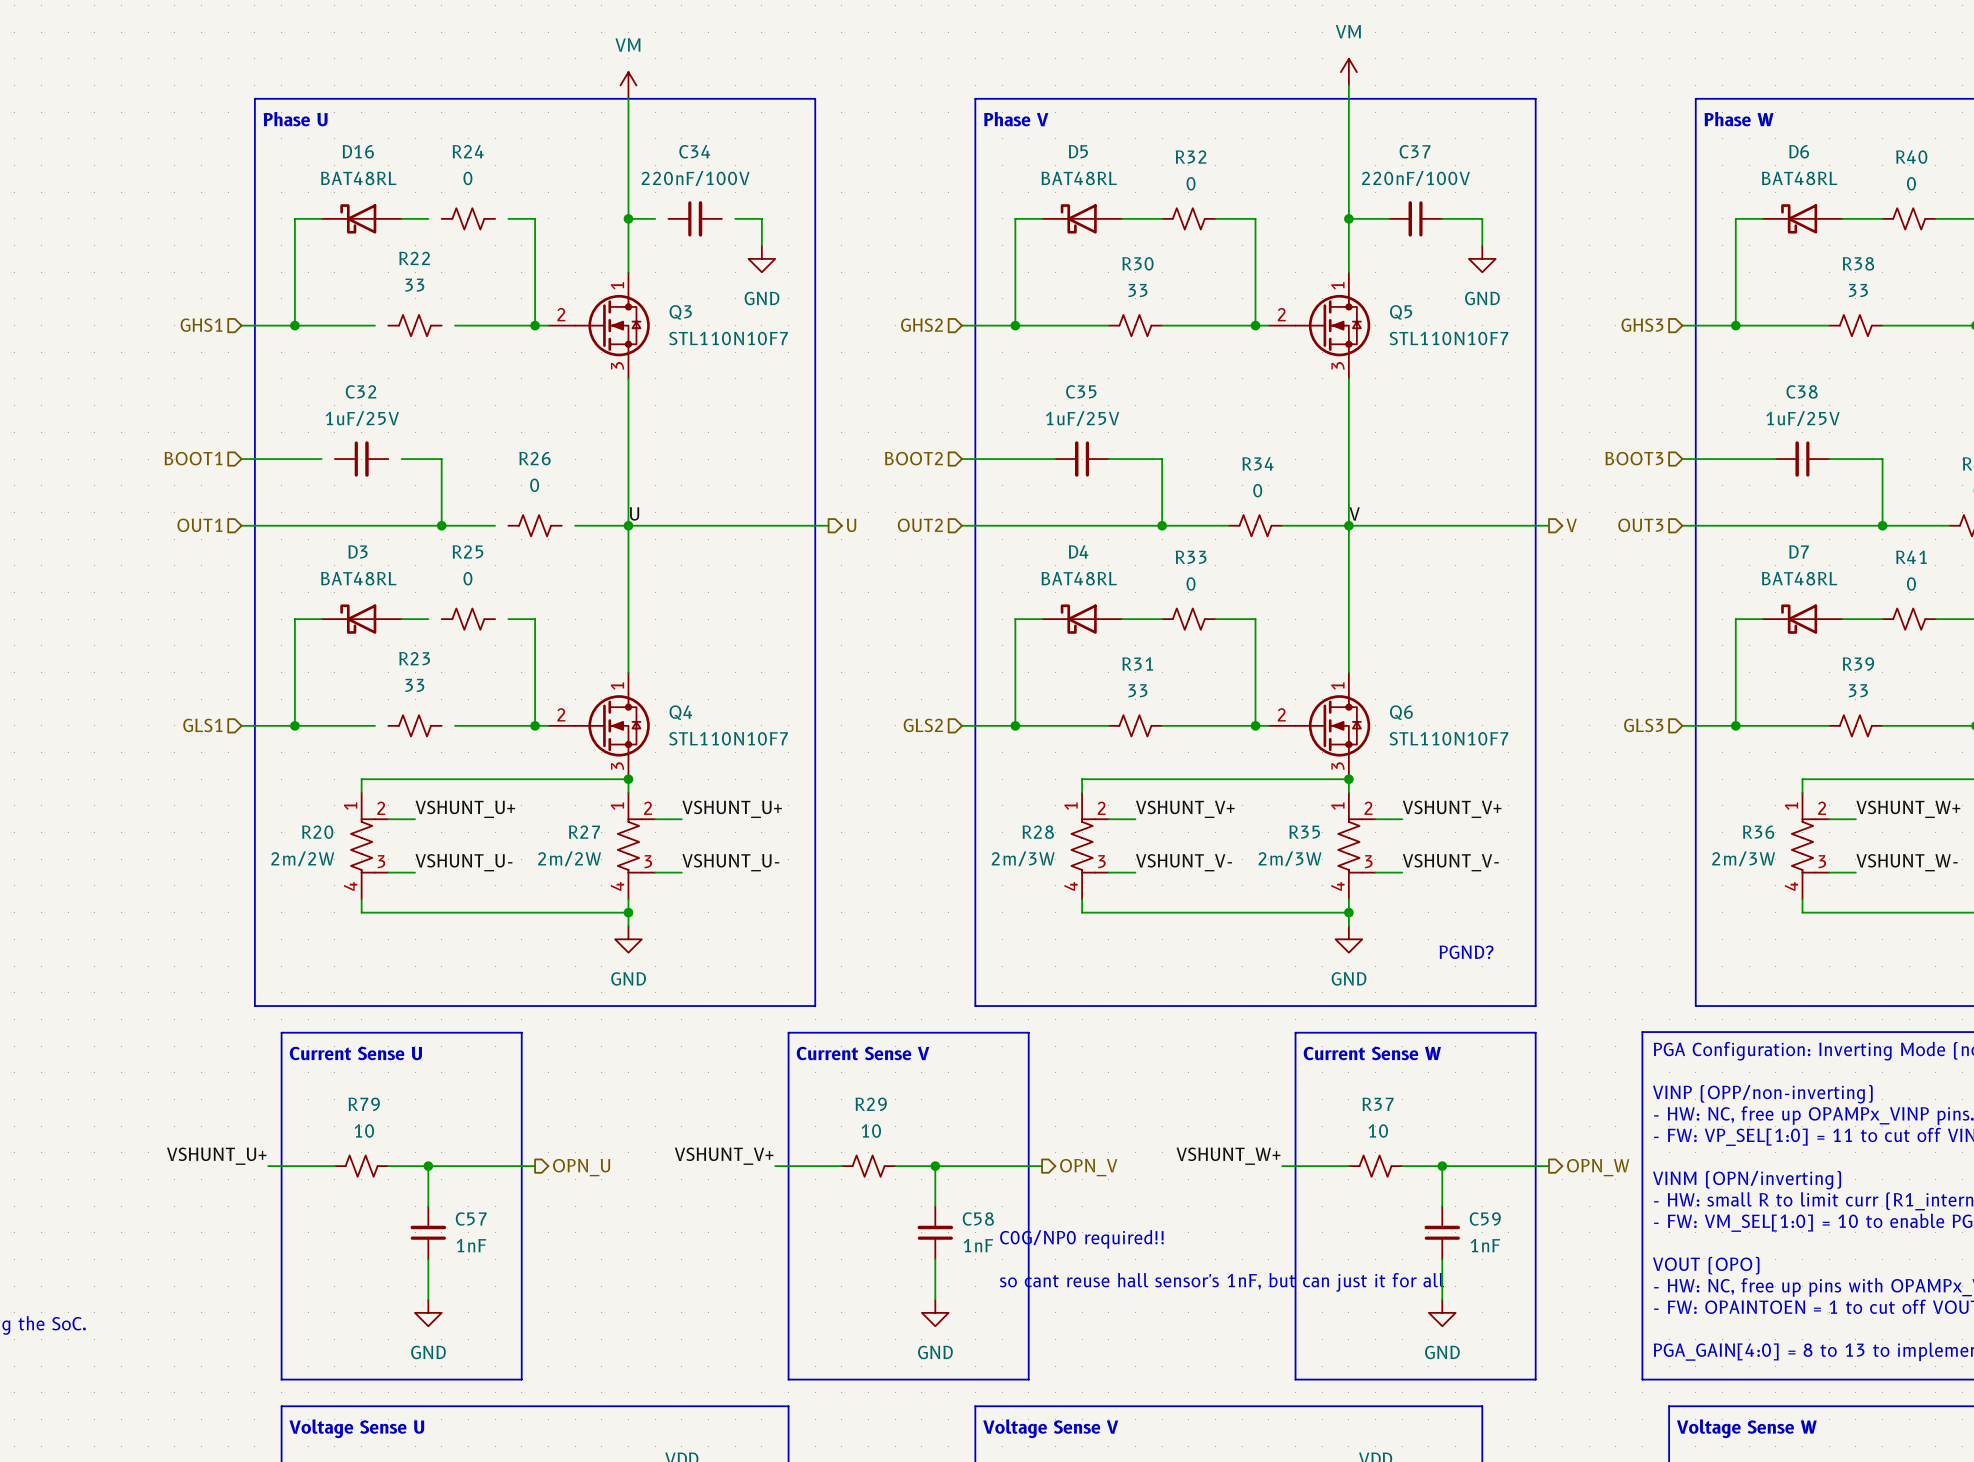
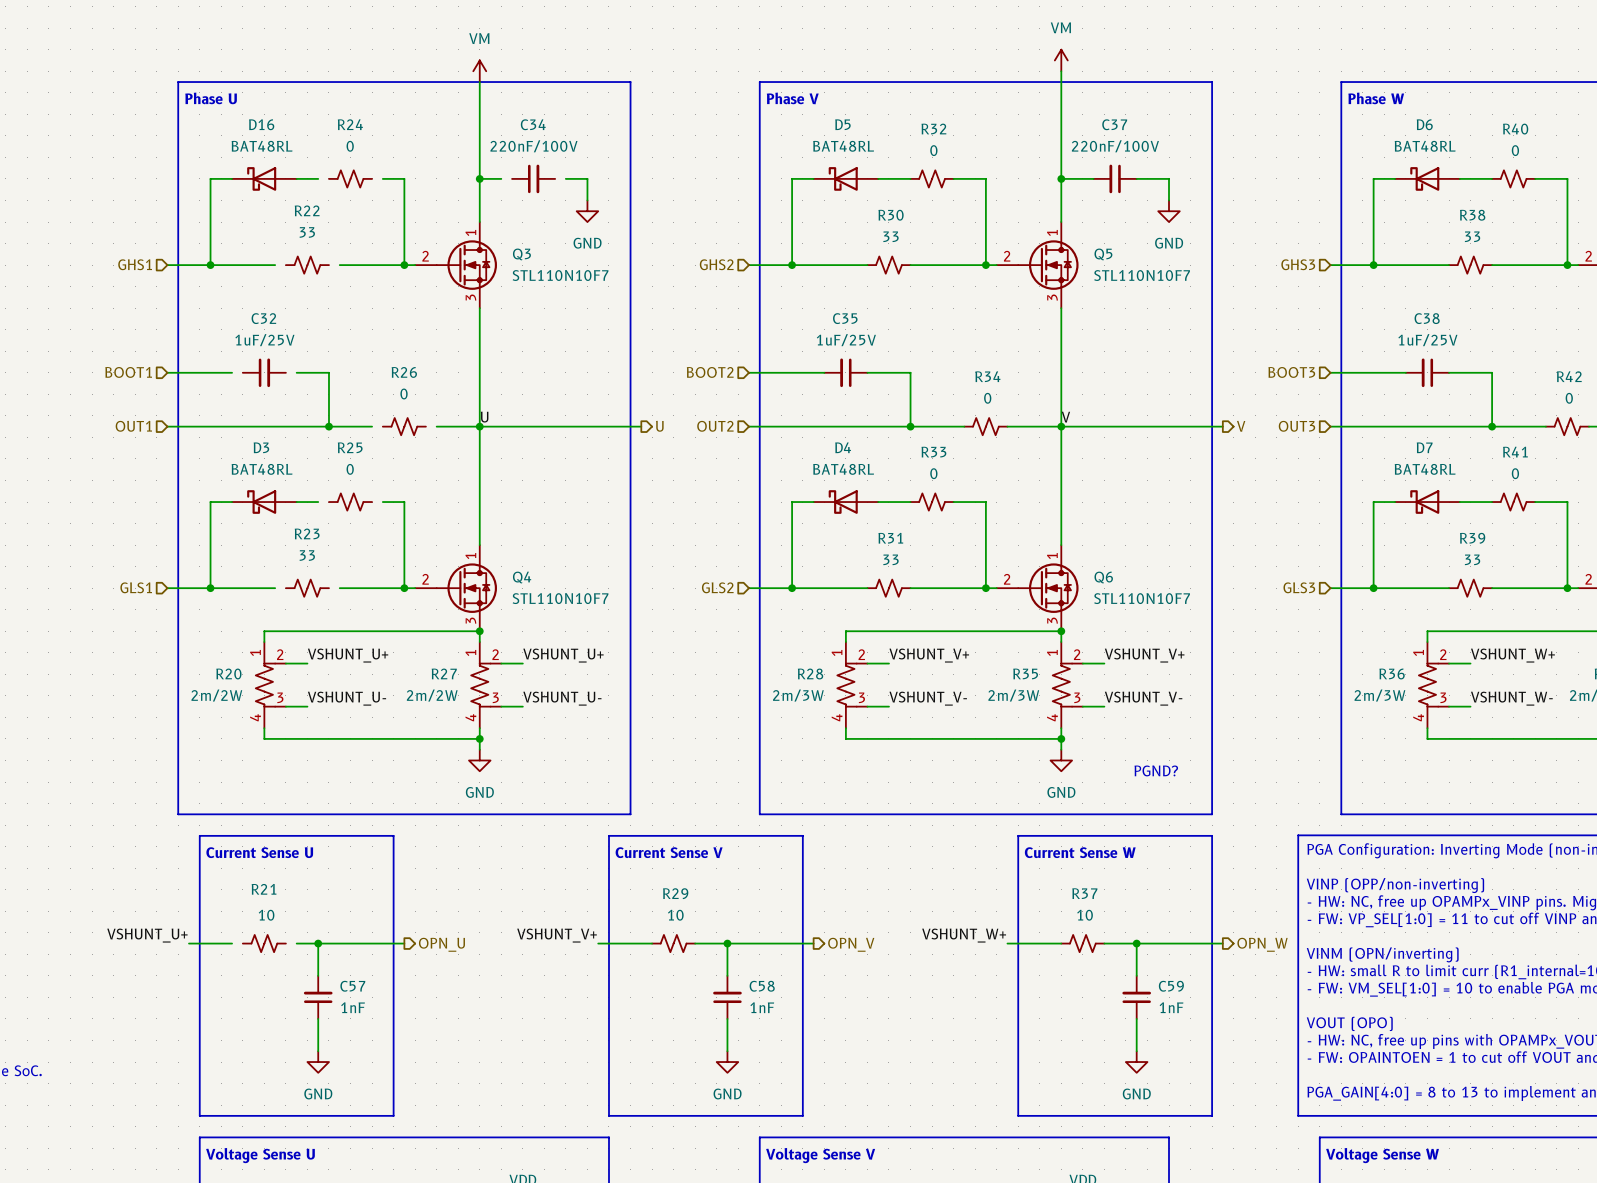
R79 name: R79 (364, 1104) -> R21 (264, 889)
wire: (321, 1166) (334, 1166) -> none
wire: (388, 1166) (401, 1166) -> none
text: C0G/NP0 required!! (1081, 1239) -> none
text: so cant reuse hall sensor's 1nF, but can just it for all (1222, 1282) -> none

